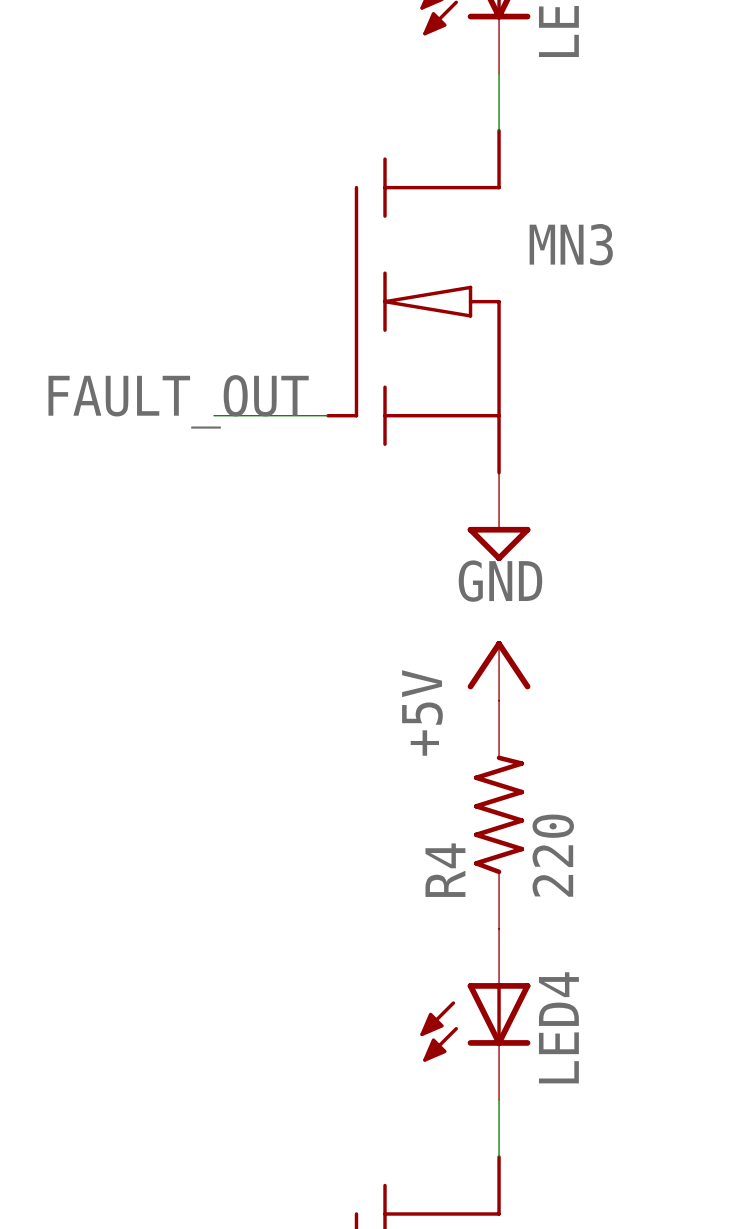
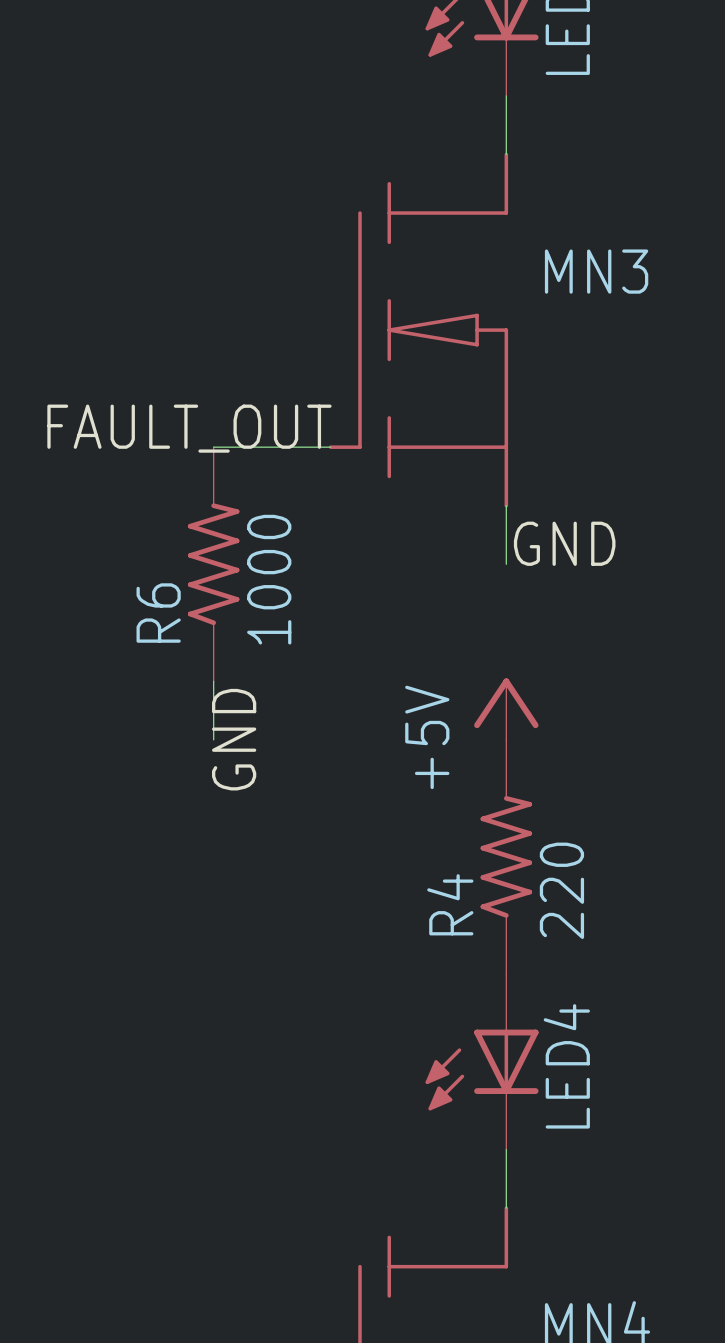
label: none -> GND (564, 543)
power symbol: GND (499, 516) -> none
R6: none -> 1000 (213, 564)
wire: none -> (213, 681) (213, 739)
label: none -> GND (234, 739)

